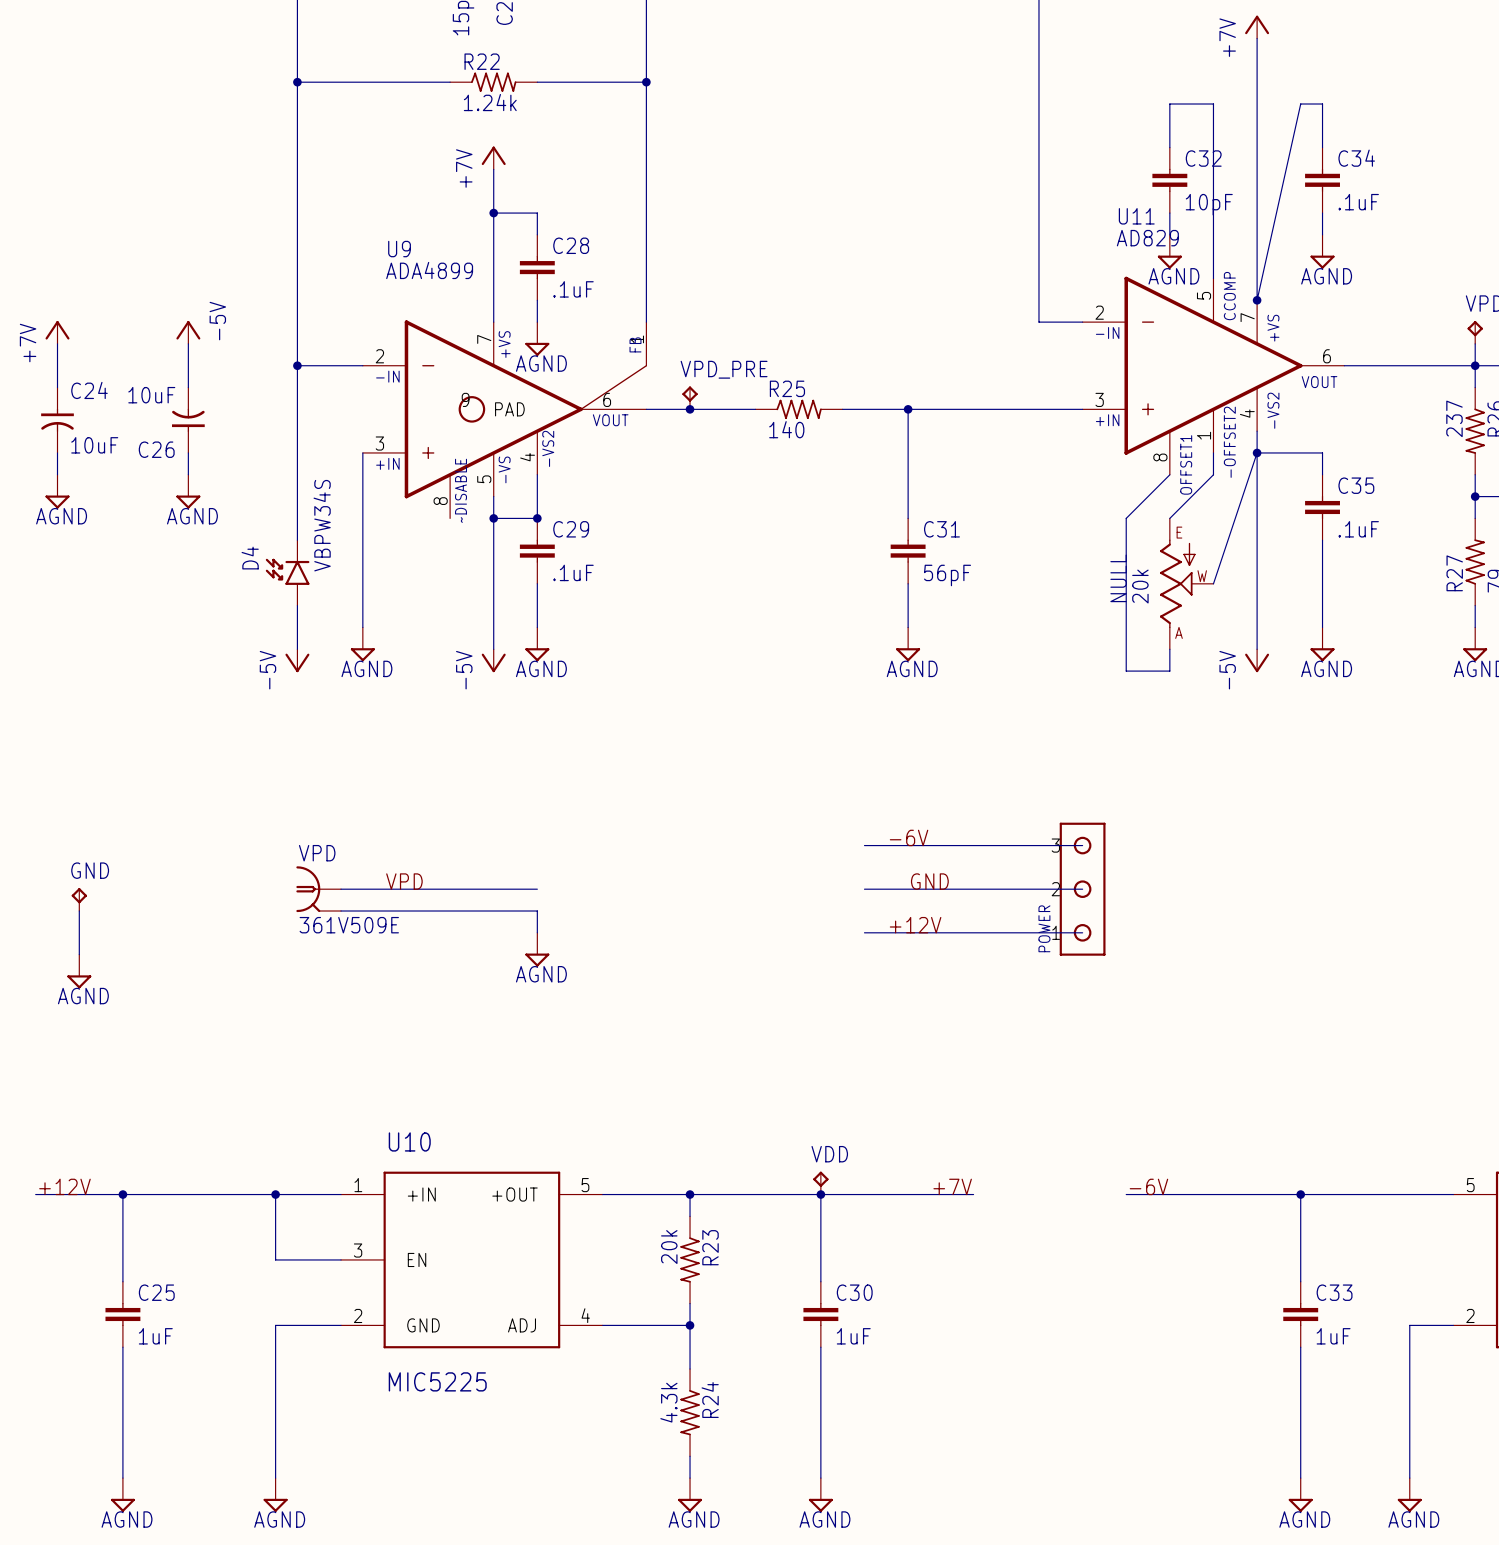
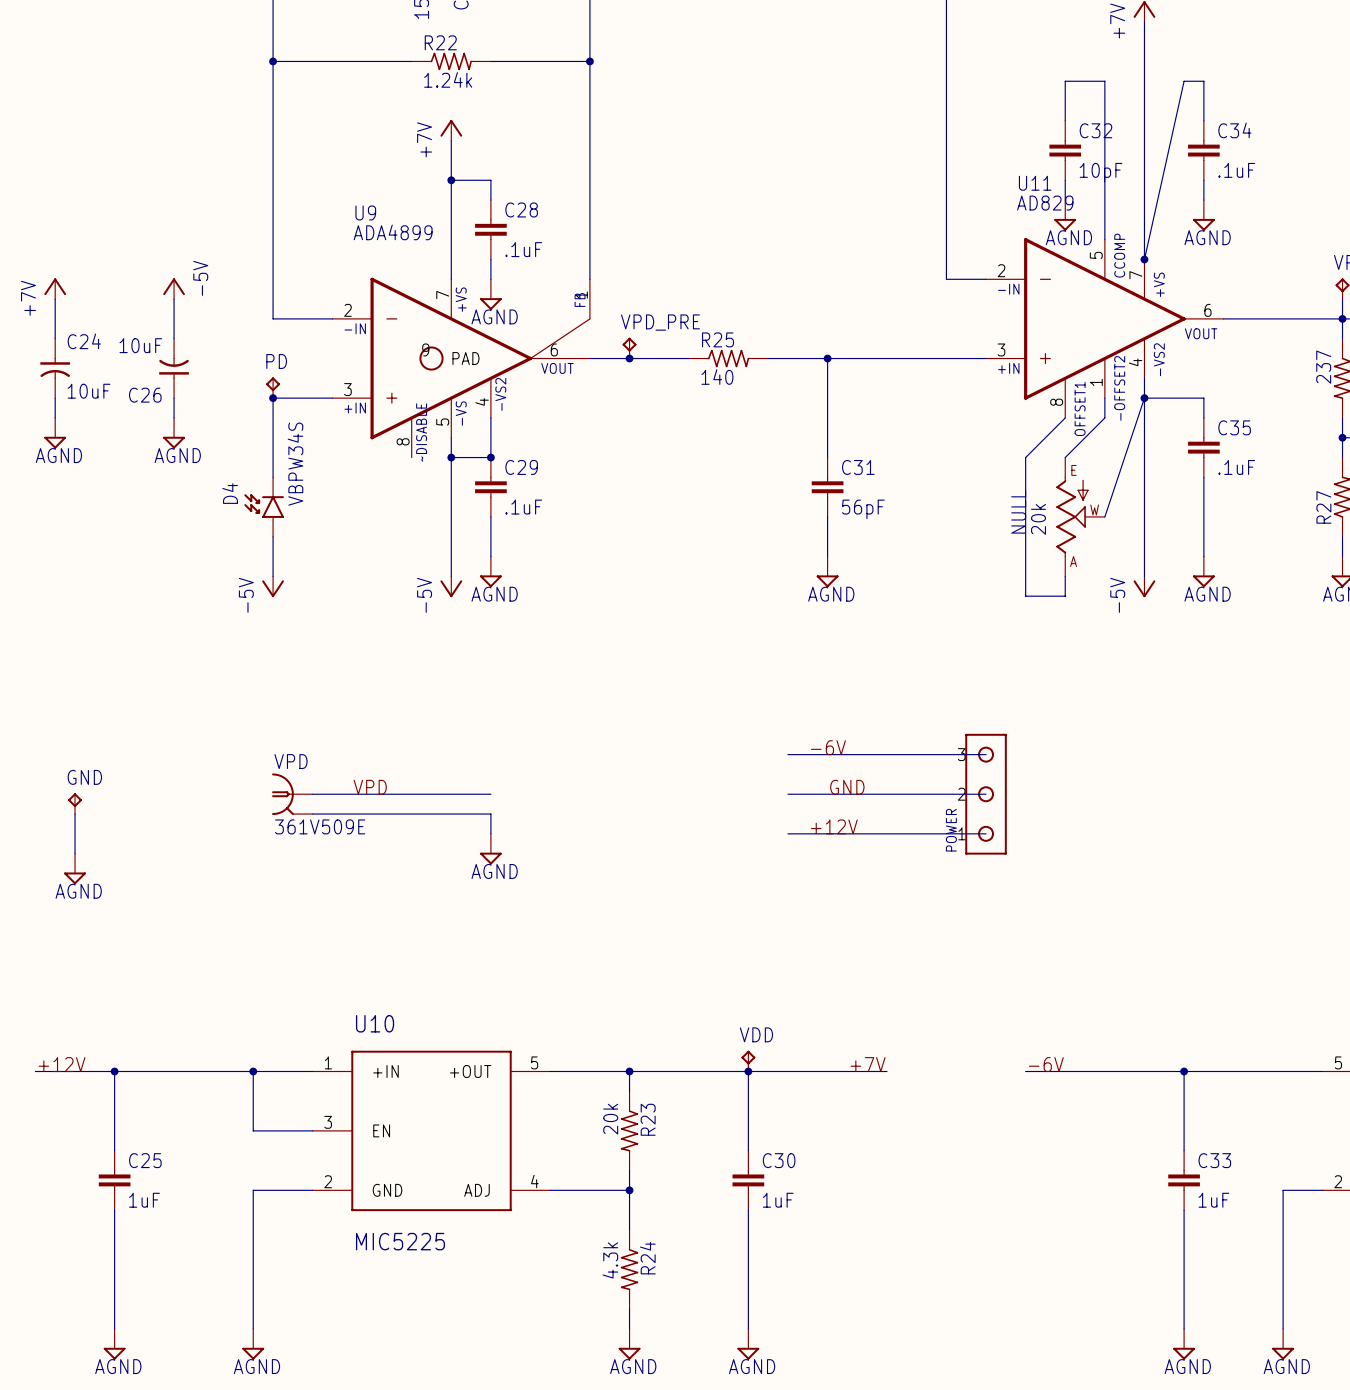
wire: (297, 365) (297, 452) -> (332, 398) (273, 398)
junction: (297, 365) -> none
PD: none -> (273, 387)
junction: none -> (273, 398)
wire: (362, 452) (362, 627) -> none
power symbol: AGND (362, 644) -> none

